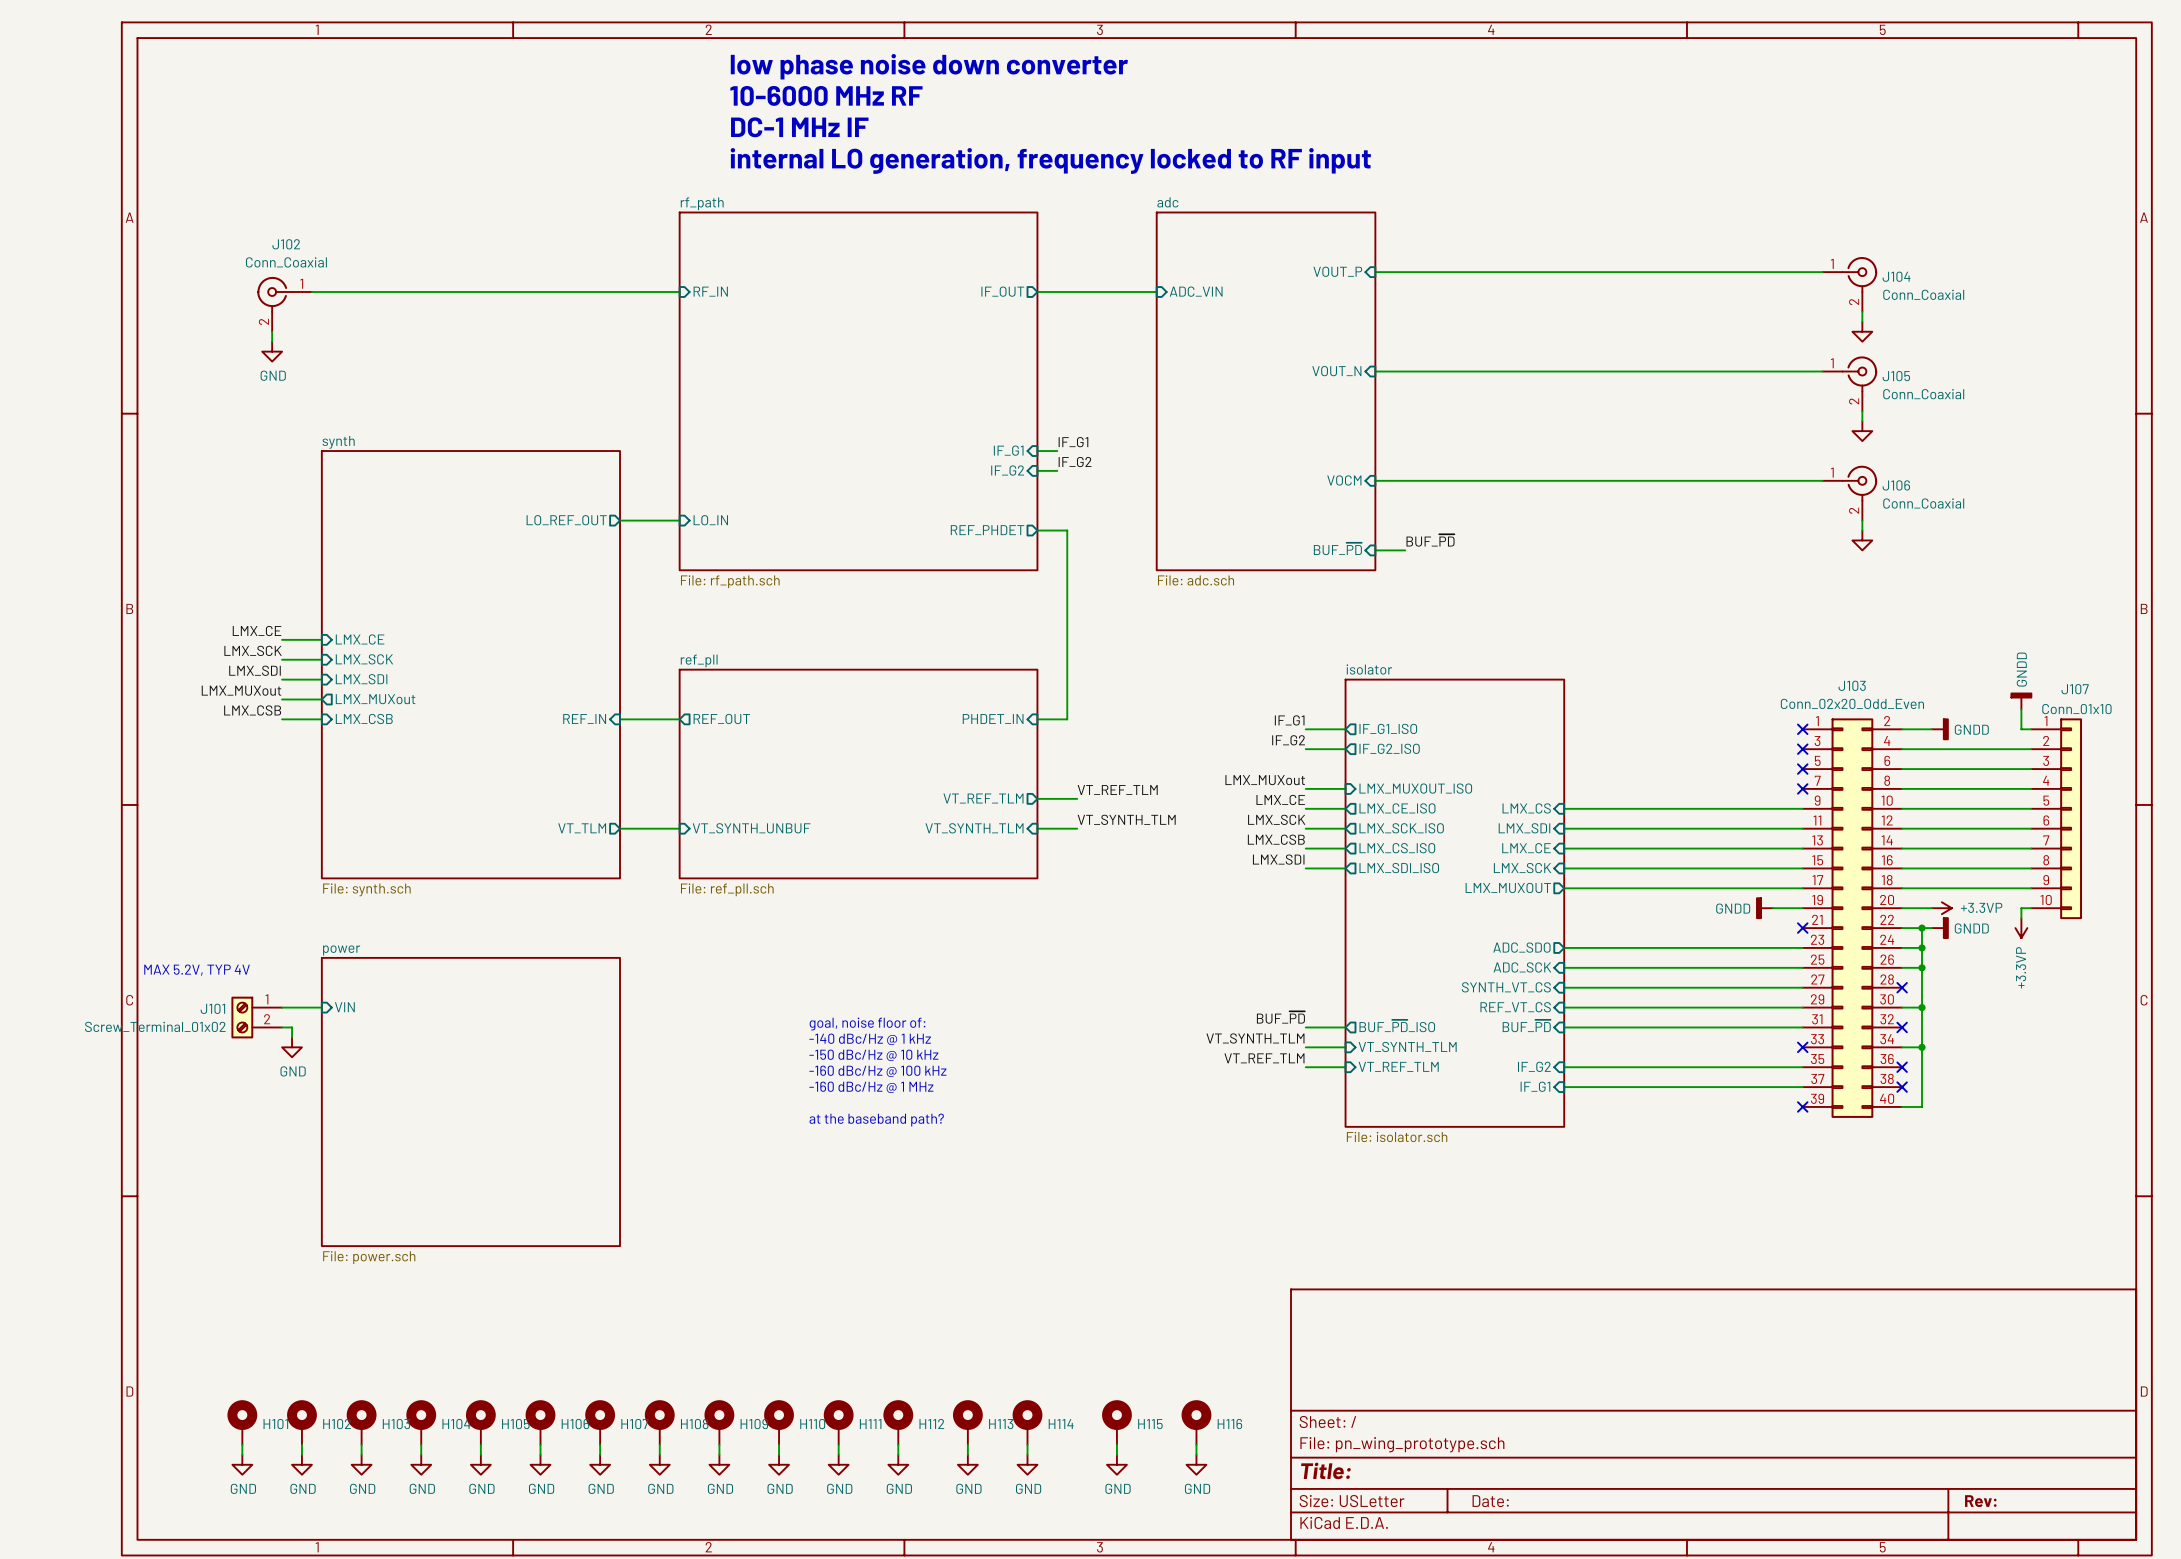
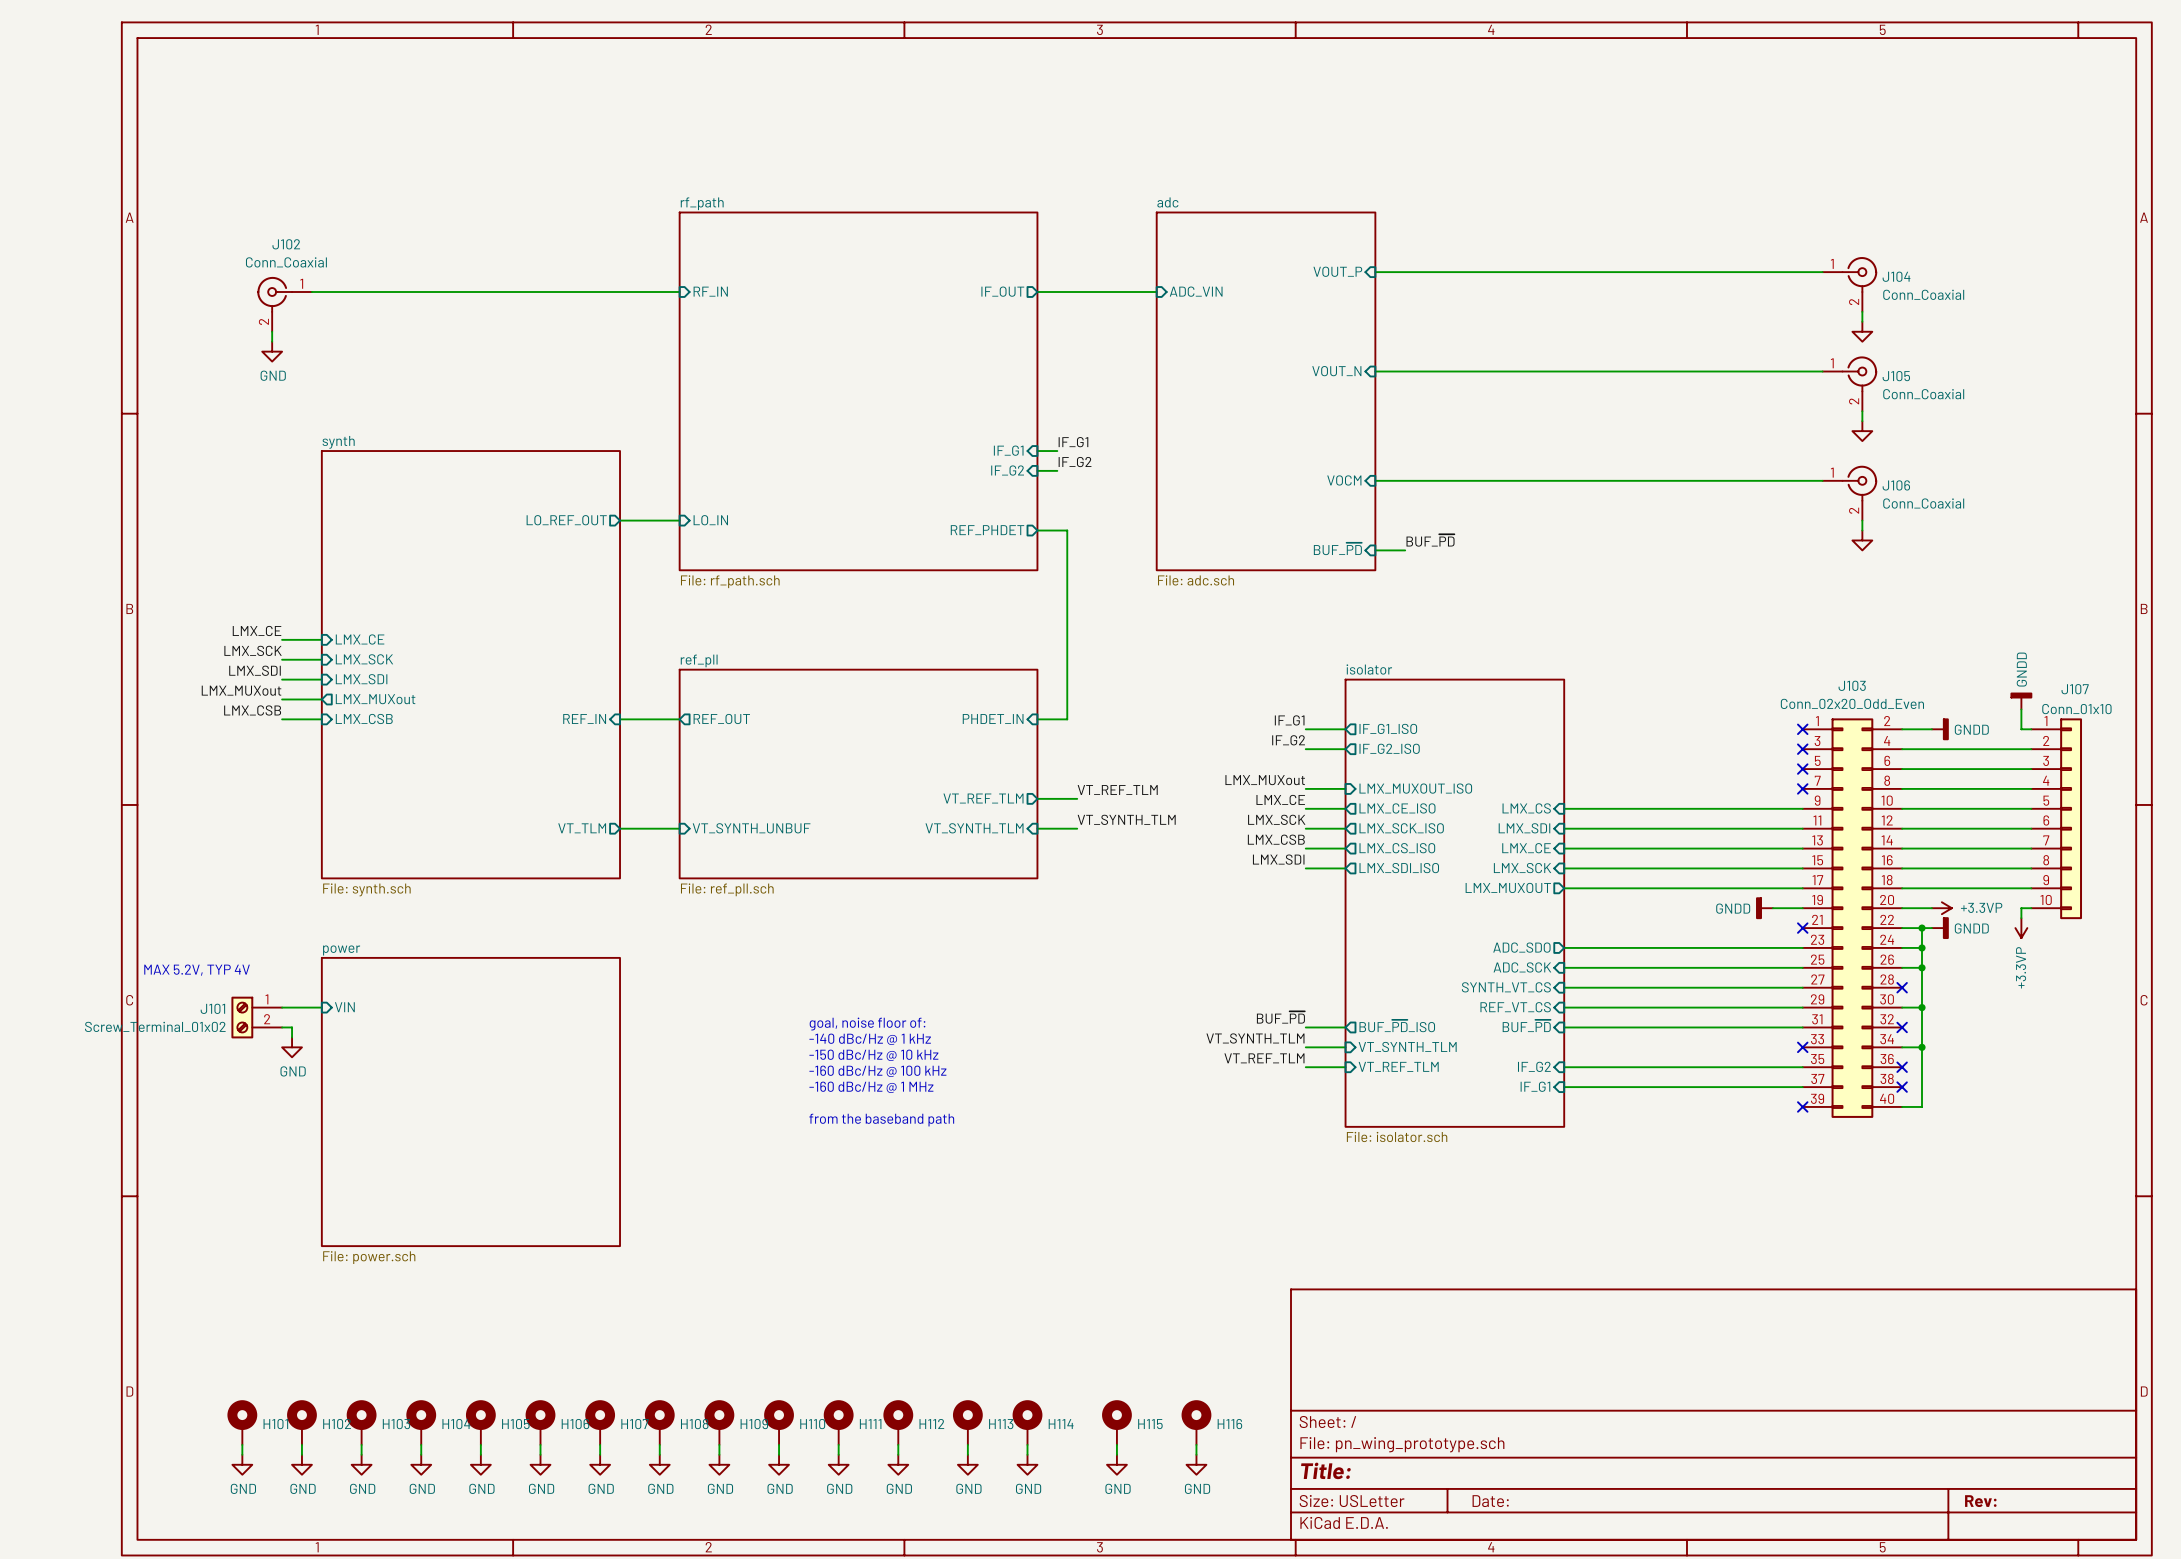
text: low phase noise down converter (929, 66) -> none
text: 10-6000 MHz RF (826, 95) -> none
text: DC-1 MHz IF (799, 127) -> none
text: internal LO generation, frequency locked to RF input (1050, 161) -> none
text: at the baseband path? (876, 1120) -> from the baseband path (881, 1120)

